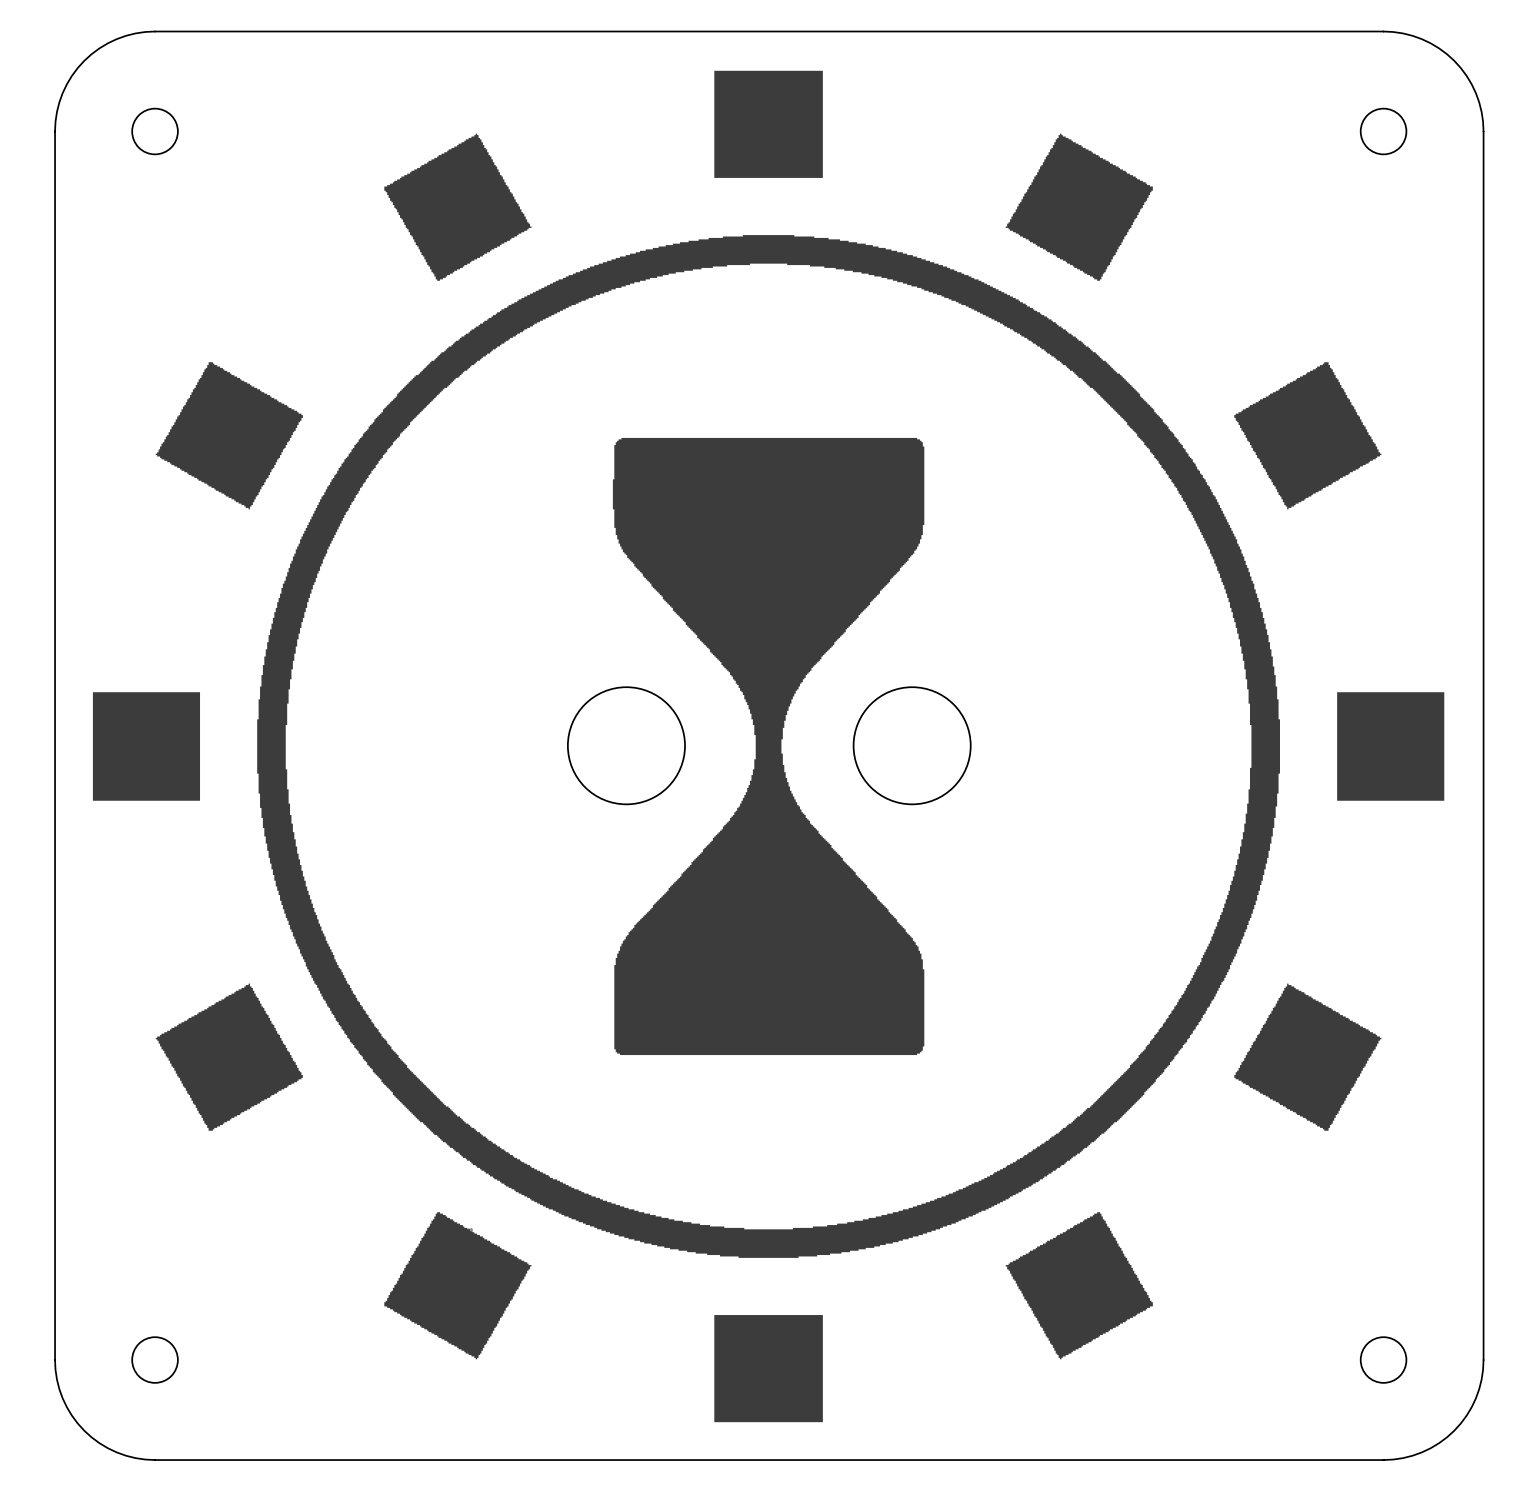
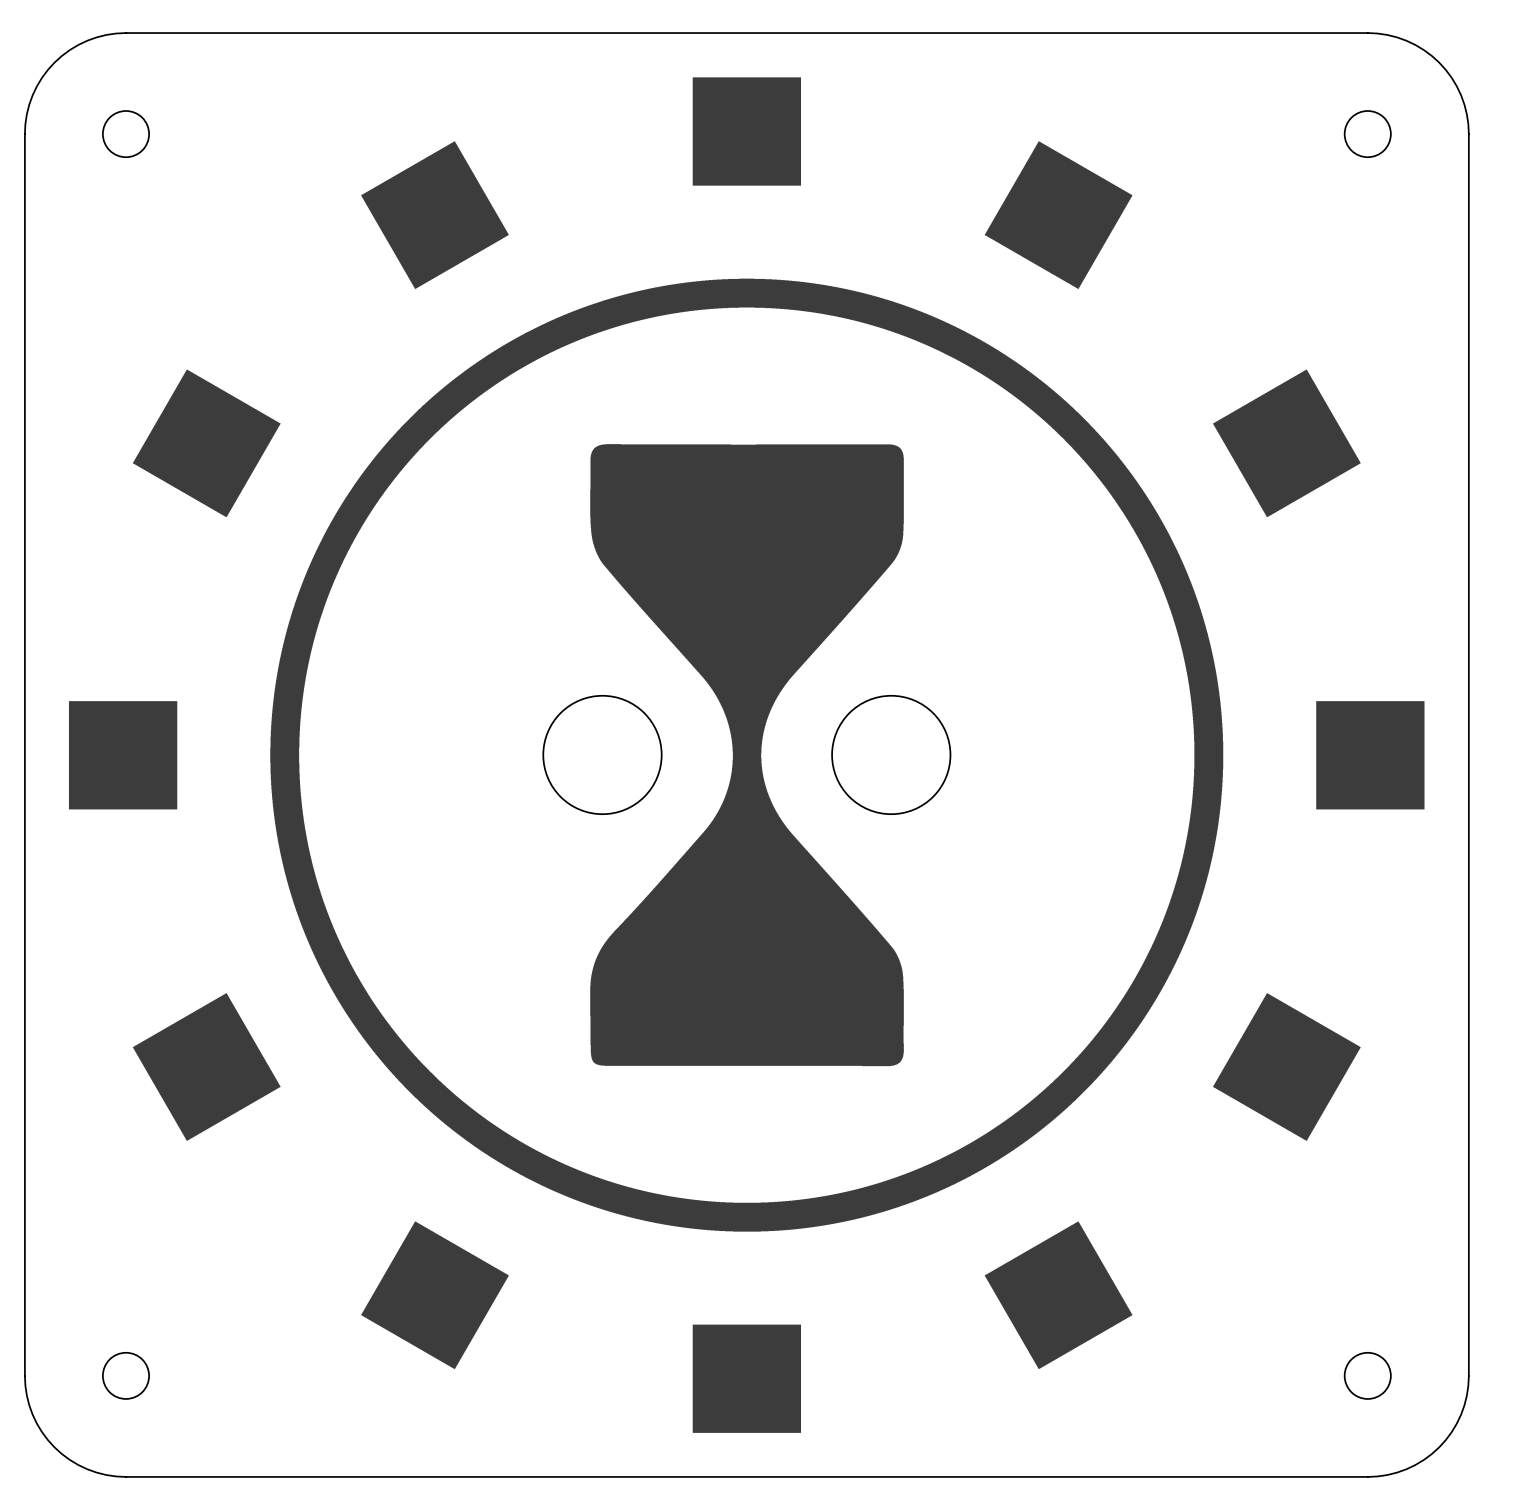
drawing shape: [92, 70, 1445, 1423] -> [68, 77, 1425, 1433]

